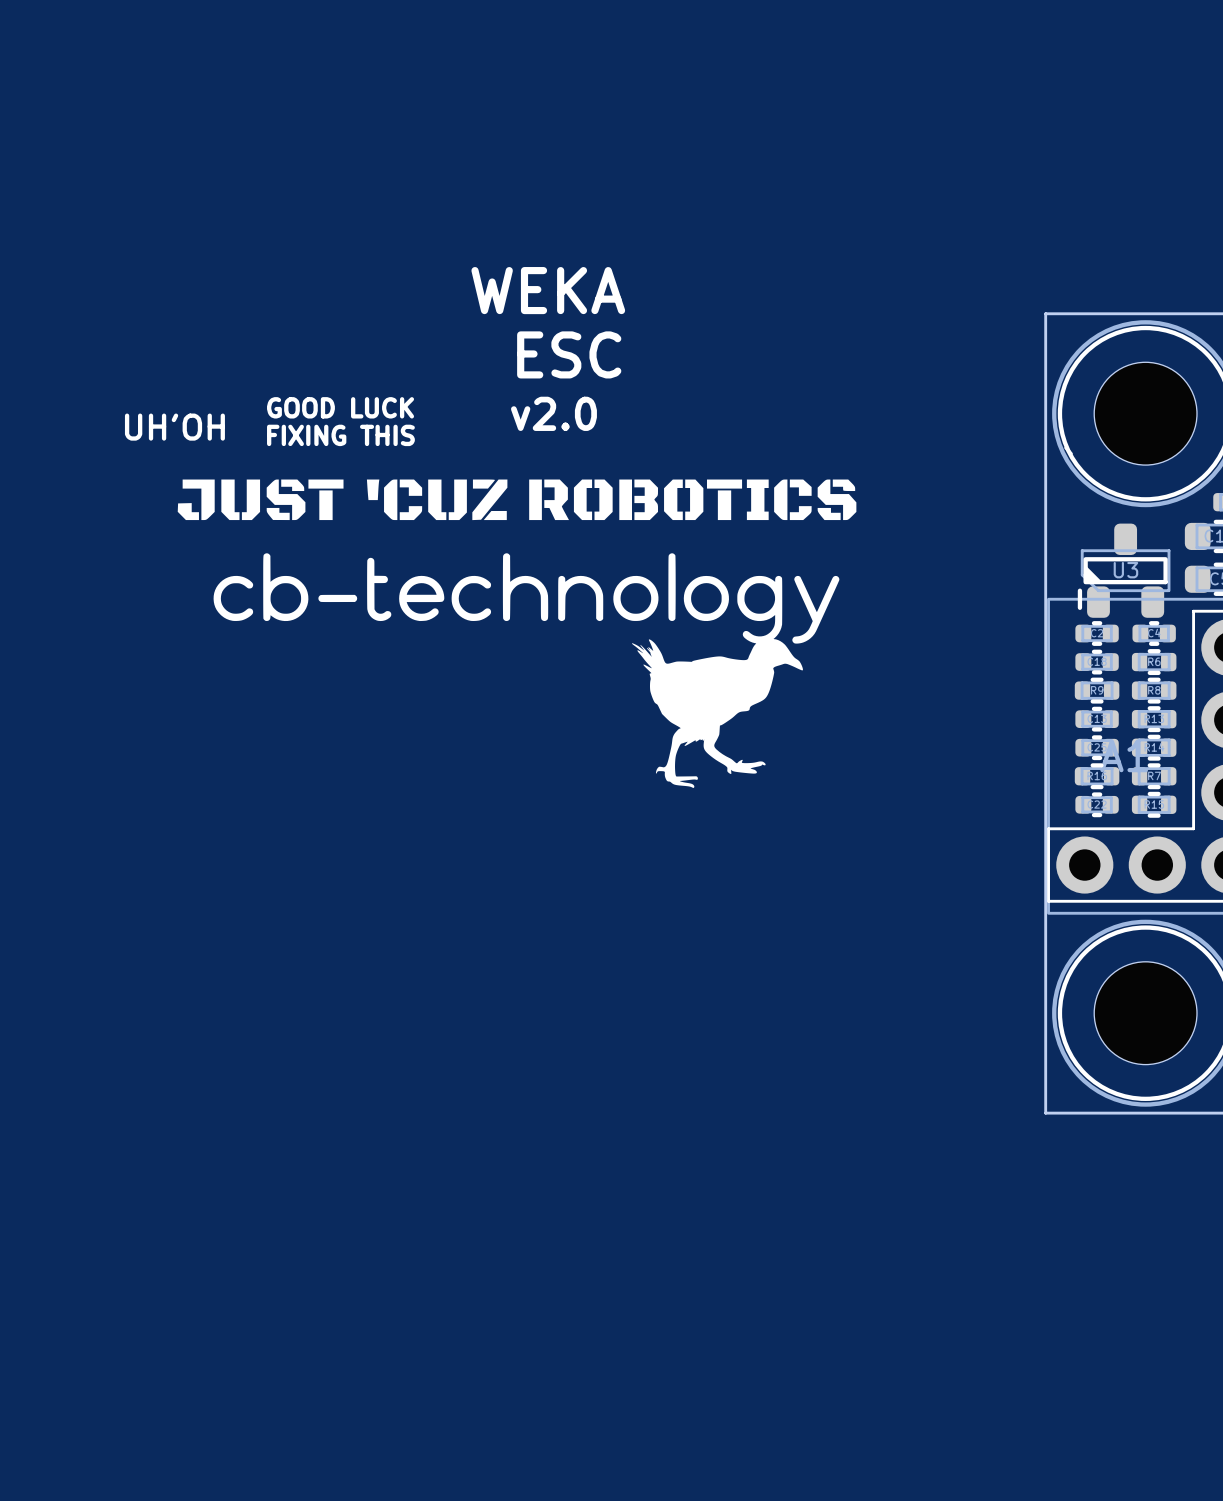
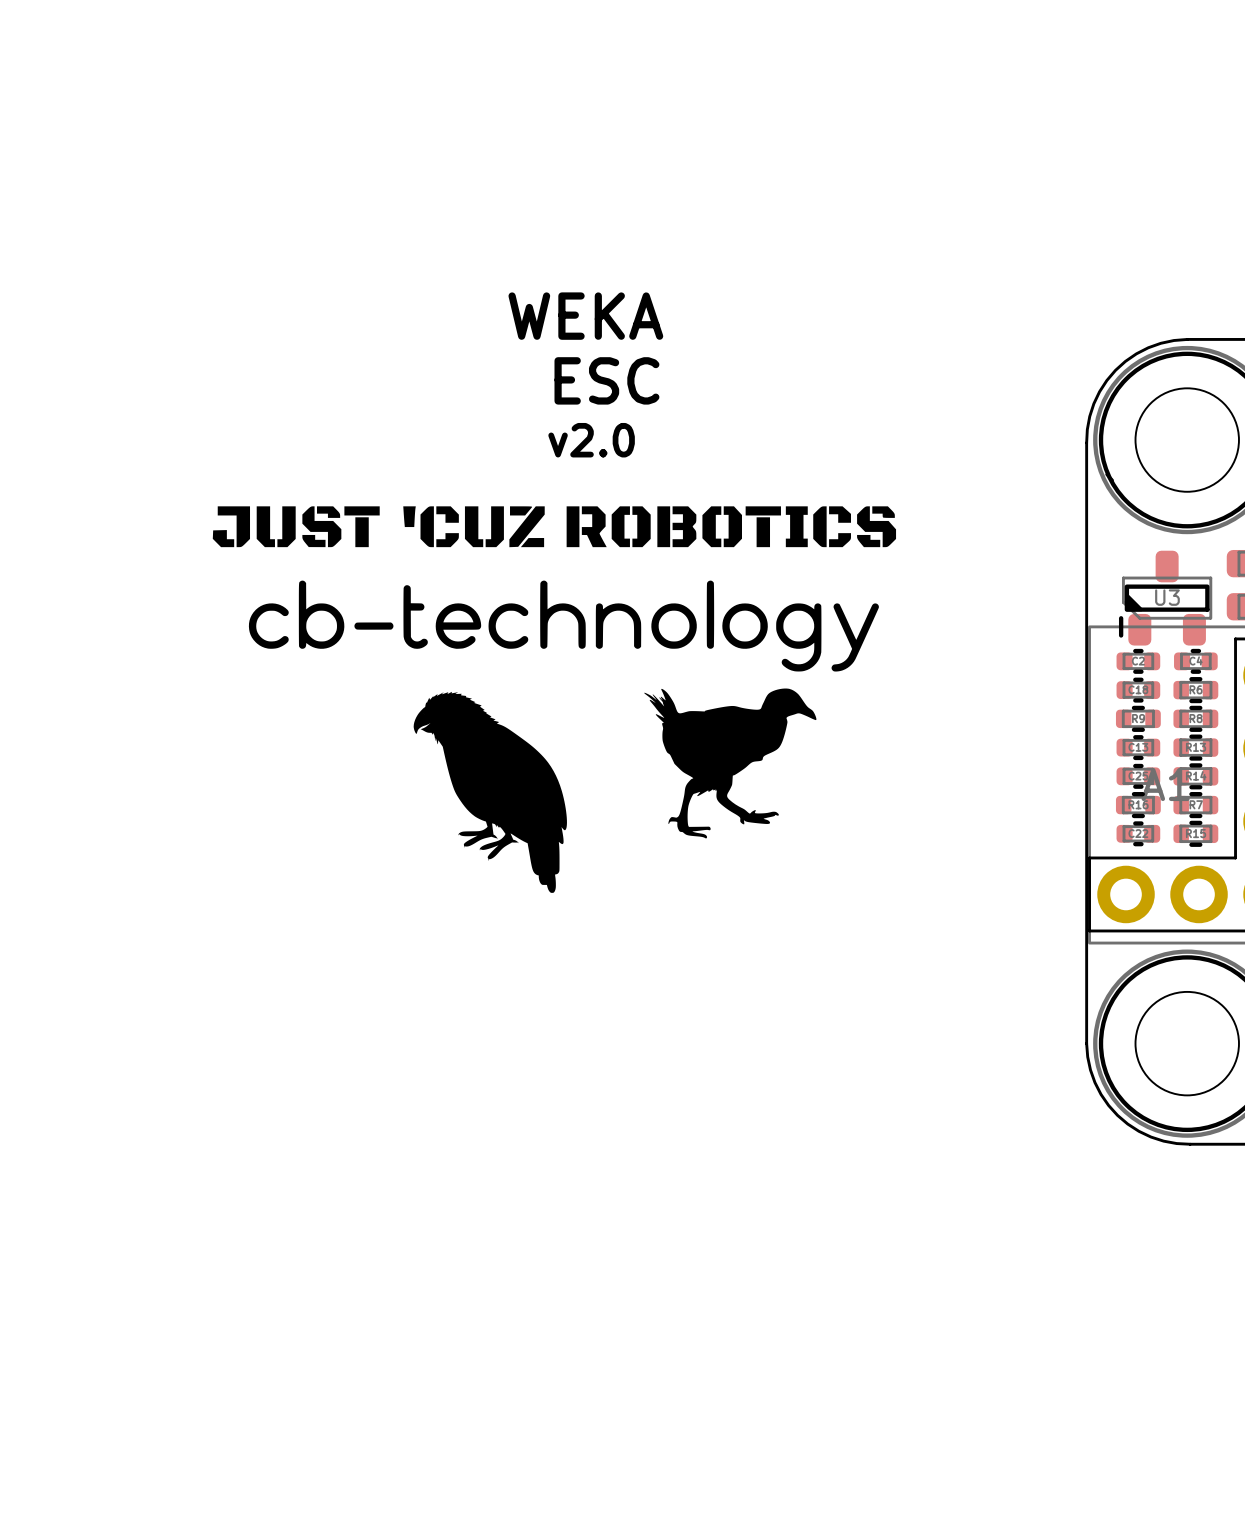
board edge: (1145, 313) (1045, 313) (1045, 416) -> (1187, 339) (1160, 343) (1148, 347) (1136, 353) (1115, 370) (1099, 391) (1093, 403) (1087, 429) (1086, 442)
text: GOOD LUCK (340, 407) -> none
text: UH'OH (174, 427) -> none
text: FIXING THIS (340, 435) -> none
drawing: none -> [413, 691, 567, 893]
drawing position: (717, 713) -> (730, 763)
board edge: (1045, 1013) (1045, 1113) (1148, 1113) -> (1086, 1043) (1087, 1056) (1094, 1082) (1101, 1094) (1117, 1115) (1138, 1131) (1150, 1137) (1163, 1141) (1190, 1144)

